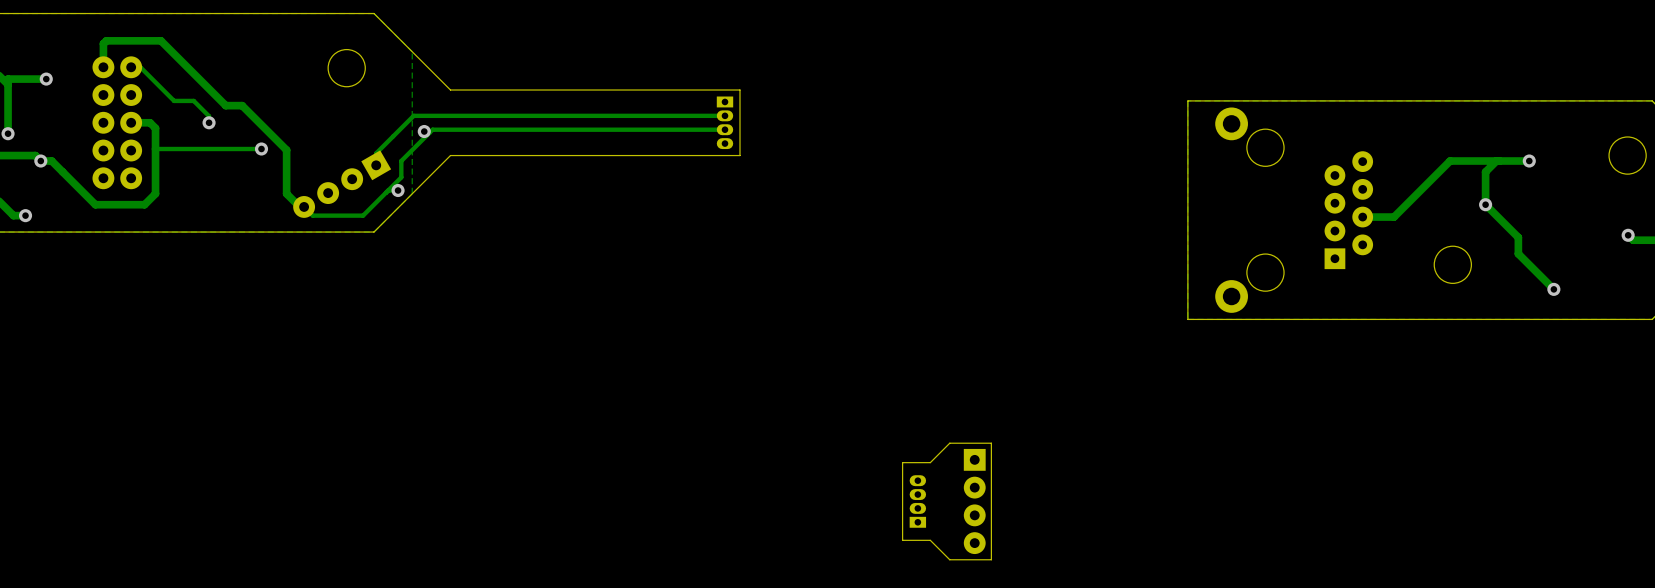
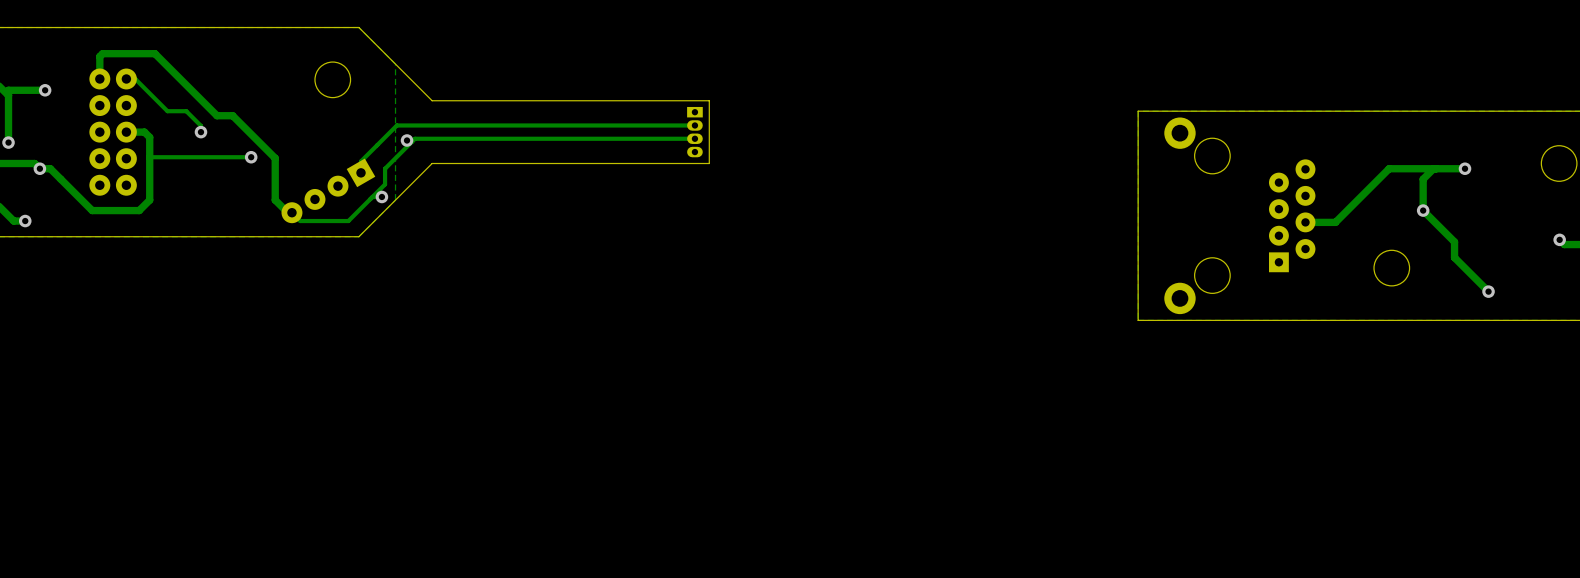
board edge: (991, 443) (991, 559) (949, 559) (930, 540) (902, 540) (902, 462) (930, 462) (949, 443) (991, 443) -> none
part: (917, 501) -> none
part: (974, 501) -> none

